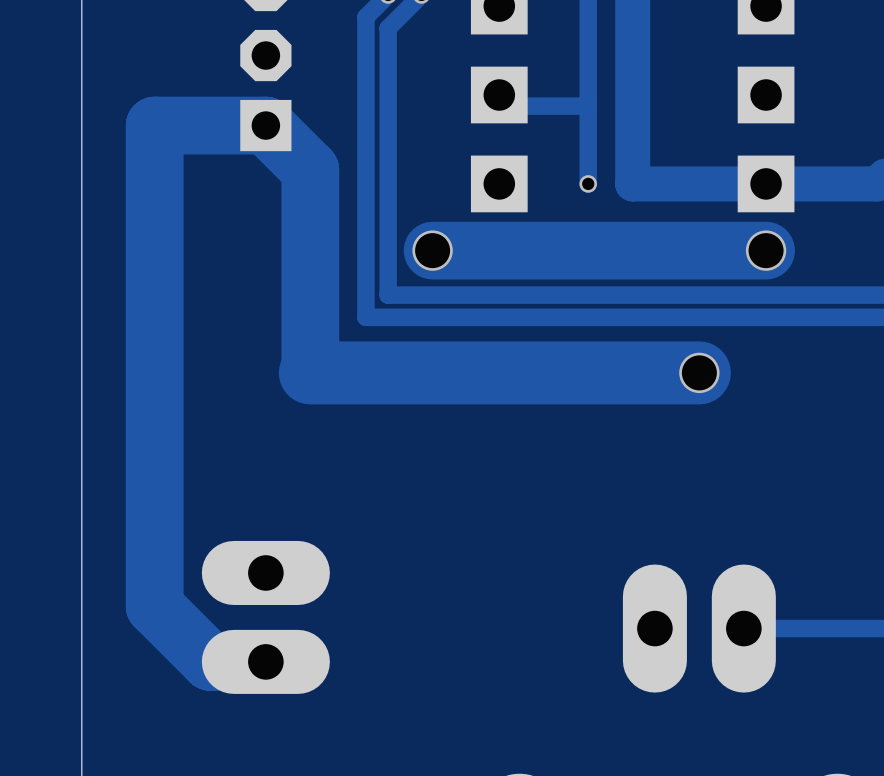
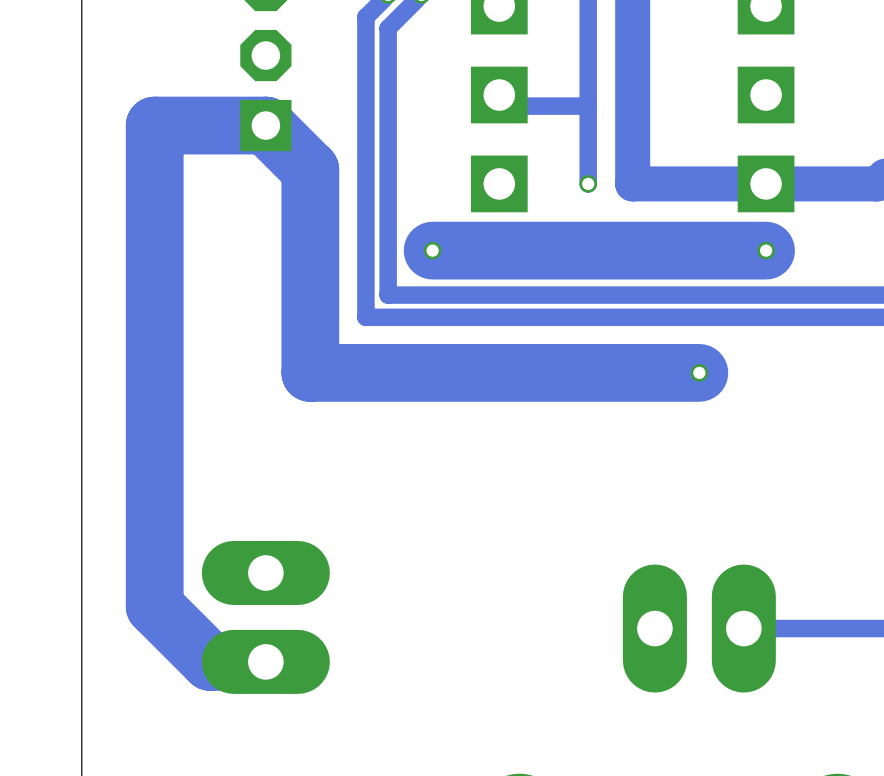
via size: [412, 230, 453, 271] -> [423, 241, 442, 260]
via size: [745, 230, 787, 271] -> [757, 241, 775, 260]
via size: [679, 352, 720, 394] -> [690, 364, 709, 382]
track width: thick (699, 372) (310, 372) -> thin (699, 372) (310, 372)

